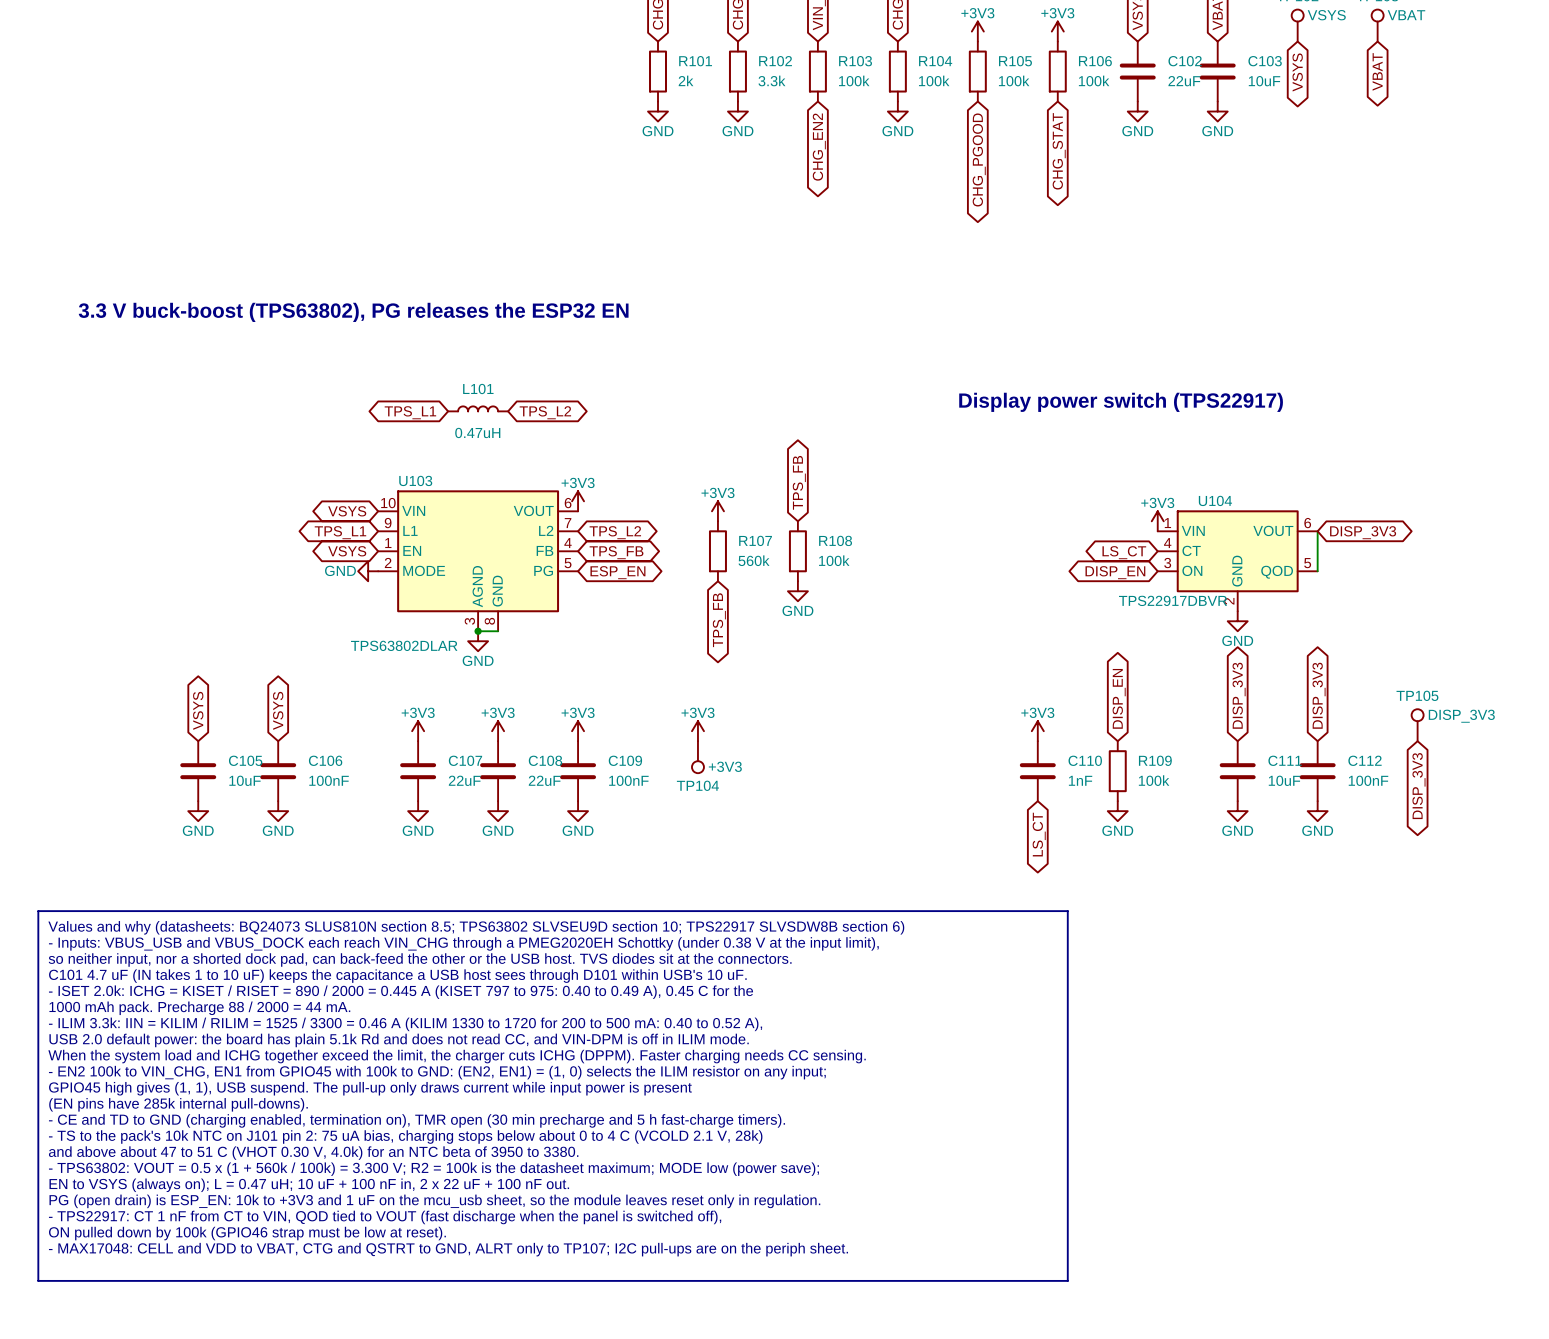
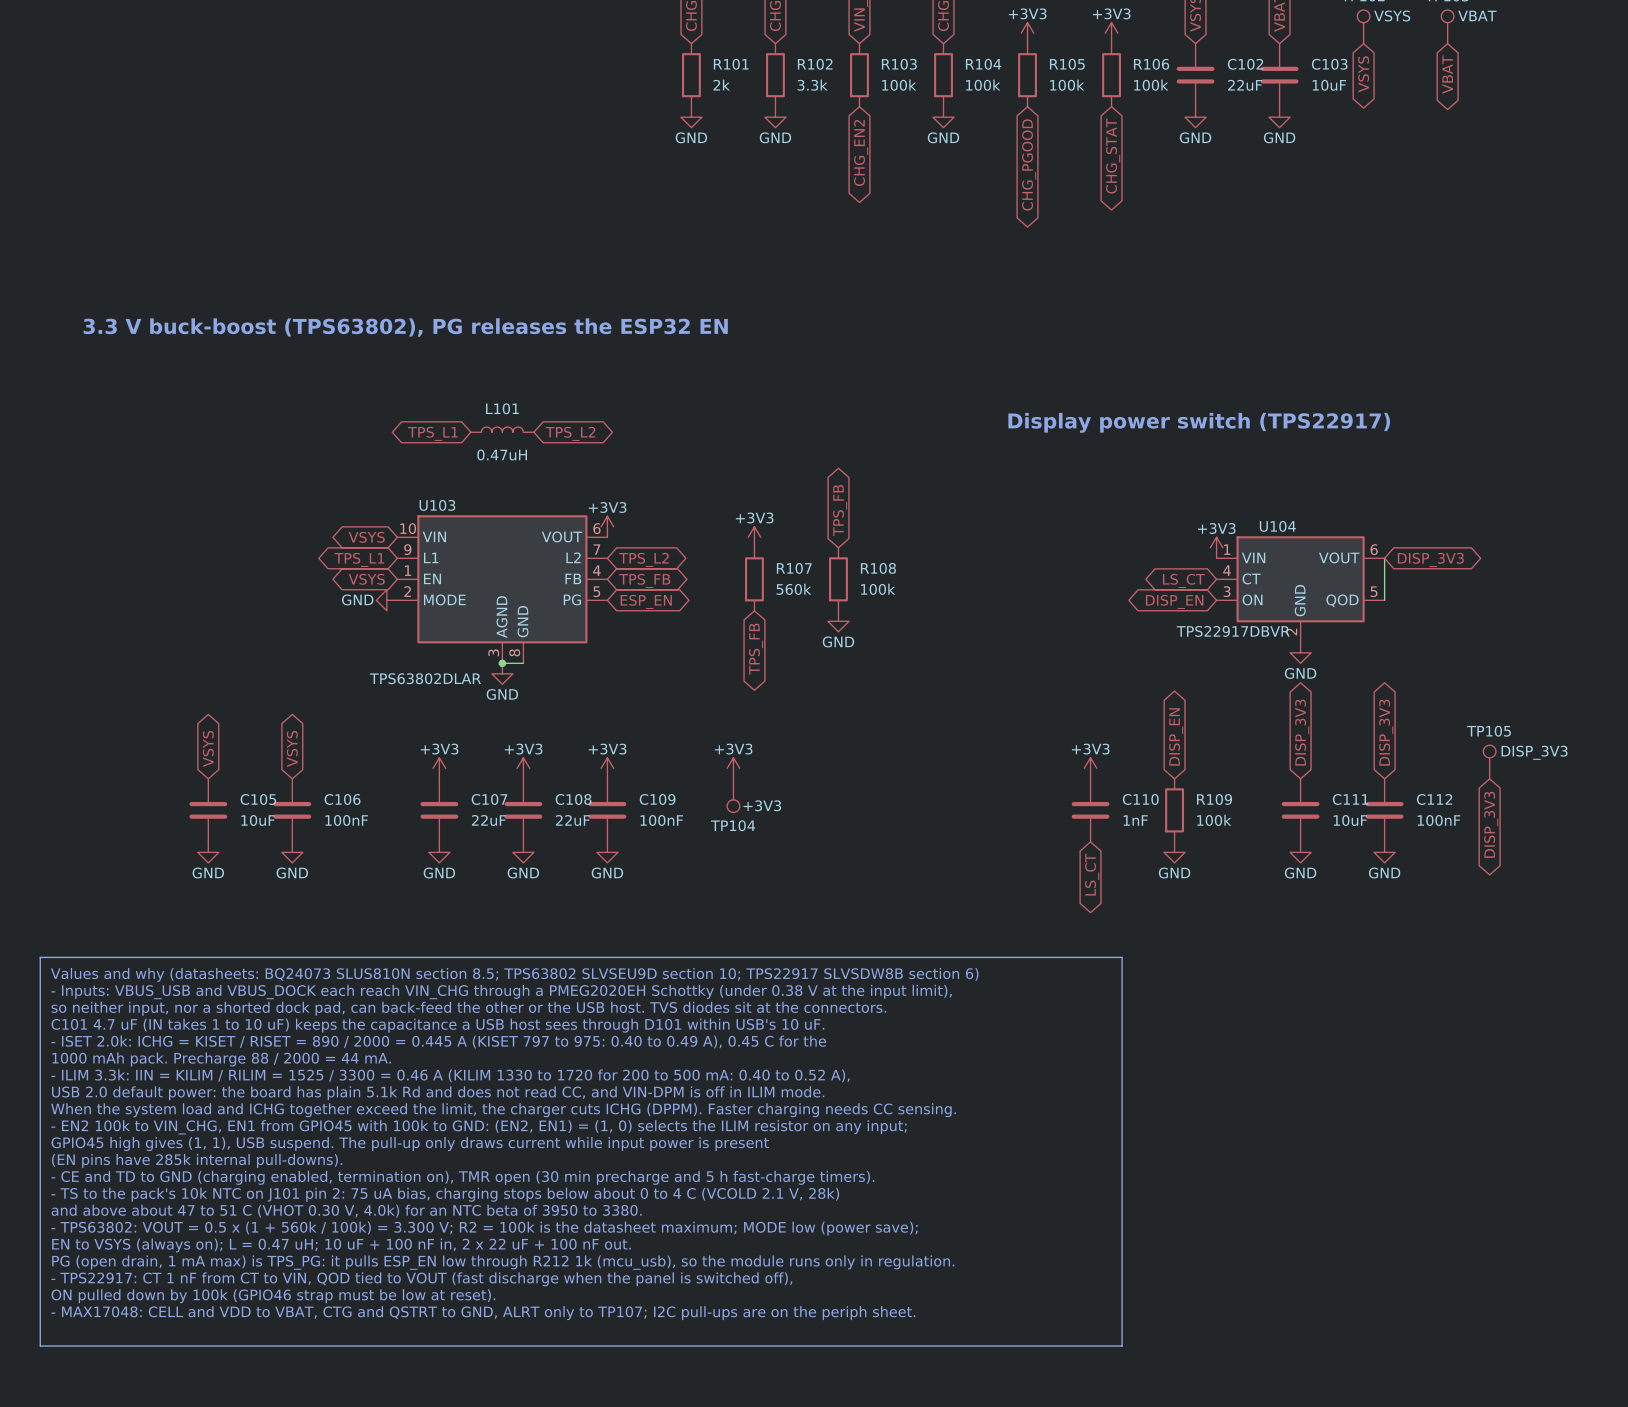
text: PG (open drain) is ESP_EN: 10k to +3V3 and 1 uF on the mcu_usb sheet, so the module leaves reset only in regulation. (434, 1201) -> PG (open drain, 1 mA max) is TPS_PG: it pulls ESP_EN low through R212 1k (mcu_usb), so the module runs only in regulation. (503, 1262)

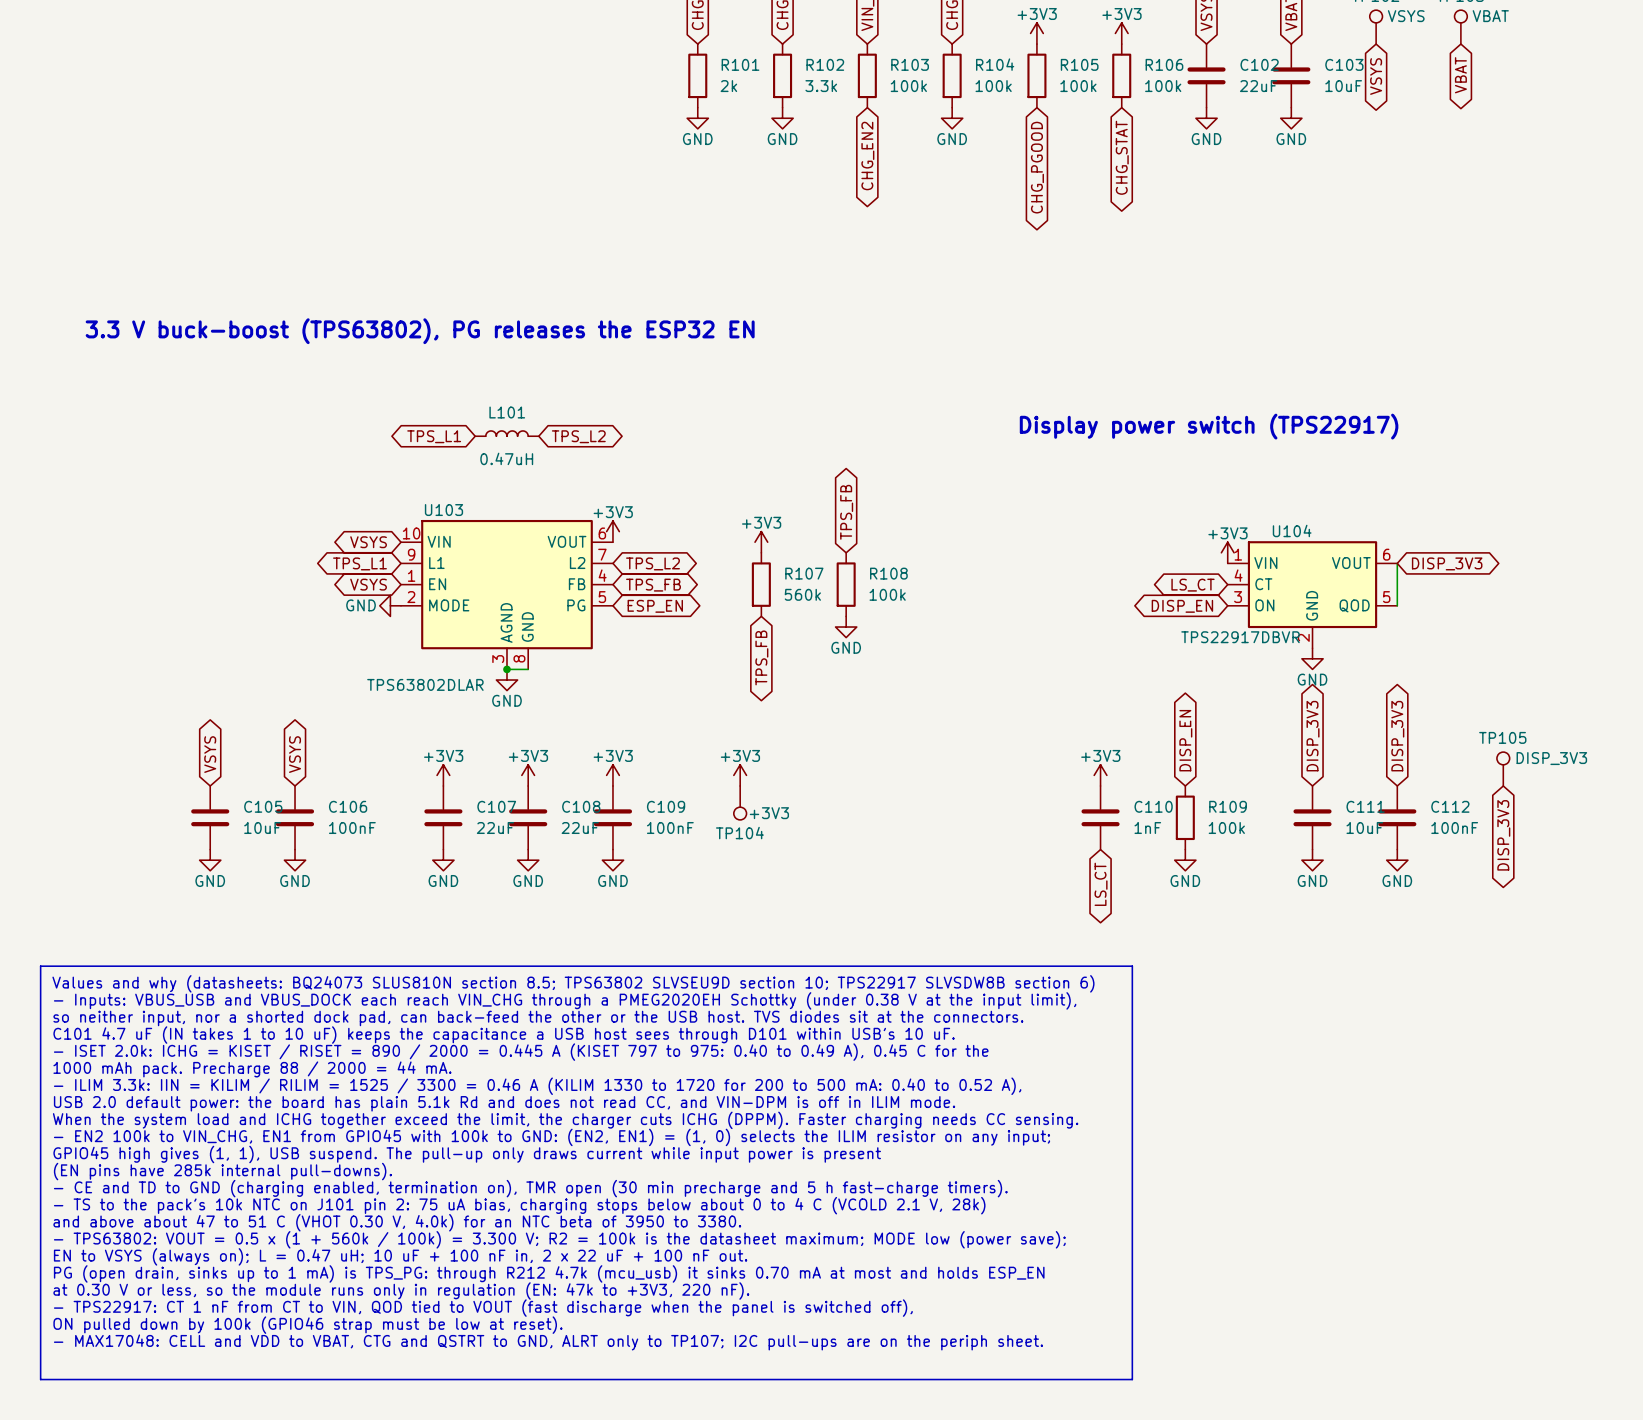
text: PG (open drain, 1 mA max) is TPS_PG: it pulls ESP_EN low through R212 1k (mcu_usb), so the module runs only in regulation. (503, 1262) -> PG (open drain, sinks up to 1 mA) is TPS_PG: through R212 4.7k (mcu_usb) it sinks 0.70 mA at most and holds ESP_EN (549, 1273)
text: - TPS22917: CT 1 nF from CT to VIN, QOD tied to VOUT (fast discharge when the panel is switched off), (421, 1279) -> at 0.30 V or less, so the module runs only in regulation (EN: 47k to +3V3, 220 nF). (401, 1291)
text: ON pulled down by 100k (GPIO46 strap must be low at reset). (273, 1296) -> - TPS22917: CT 1 nF from CT to VIN, QOD tied to VOUT (fast discharge when the panel is switched off), (483, 1308)
text: - MAX17048: CELL and VDD to VBAT, CTG and QSTRT to GND, ALRT only to TP107; I2C pull-ups are on the periph sheet. (483, 1313) -> ON pulled down by 100k (GPIO46 strap must be low at reset). (307, 1325)
text: none -> - MAX17048: CELL and VDD to VBAT, CTG and QSTRT to GND, ALRT only to TP107; I2C pull-ups are on the periph sheet. (548, 1342)
line: (40, 1346) (1122, 1346) -> (40, 1358) (40, 1379) (1132, 1379) (1132, 1358)

